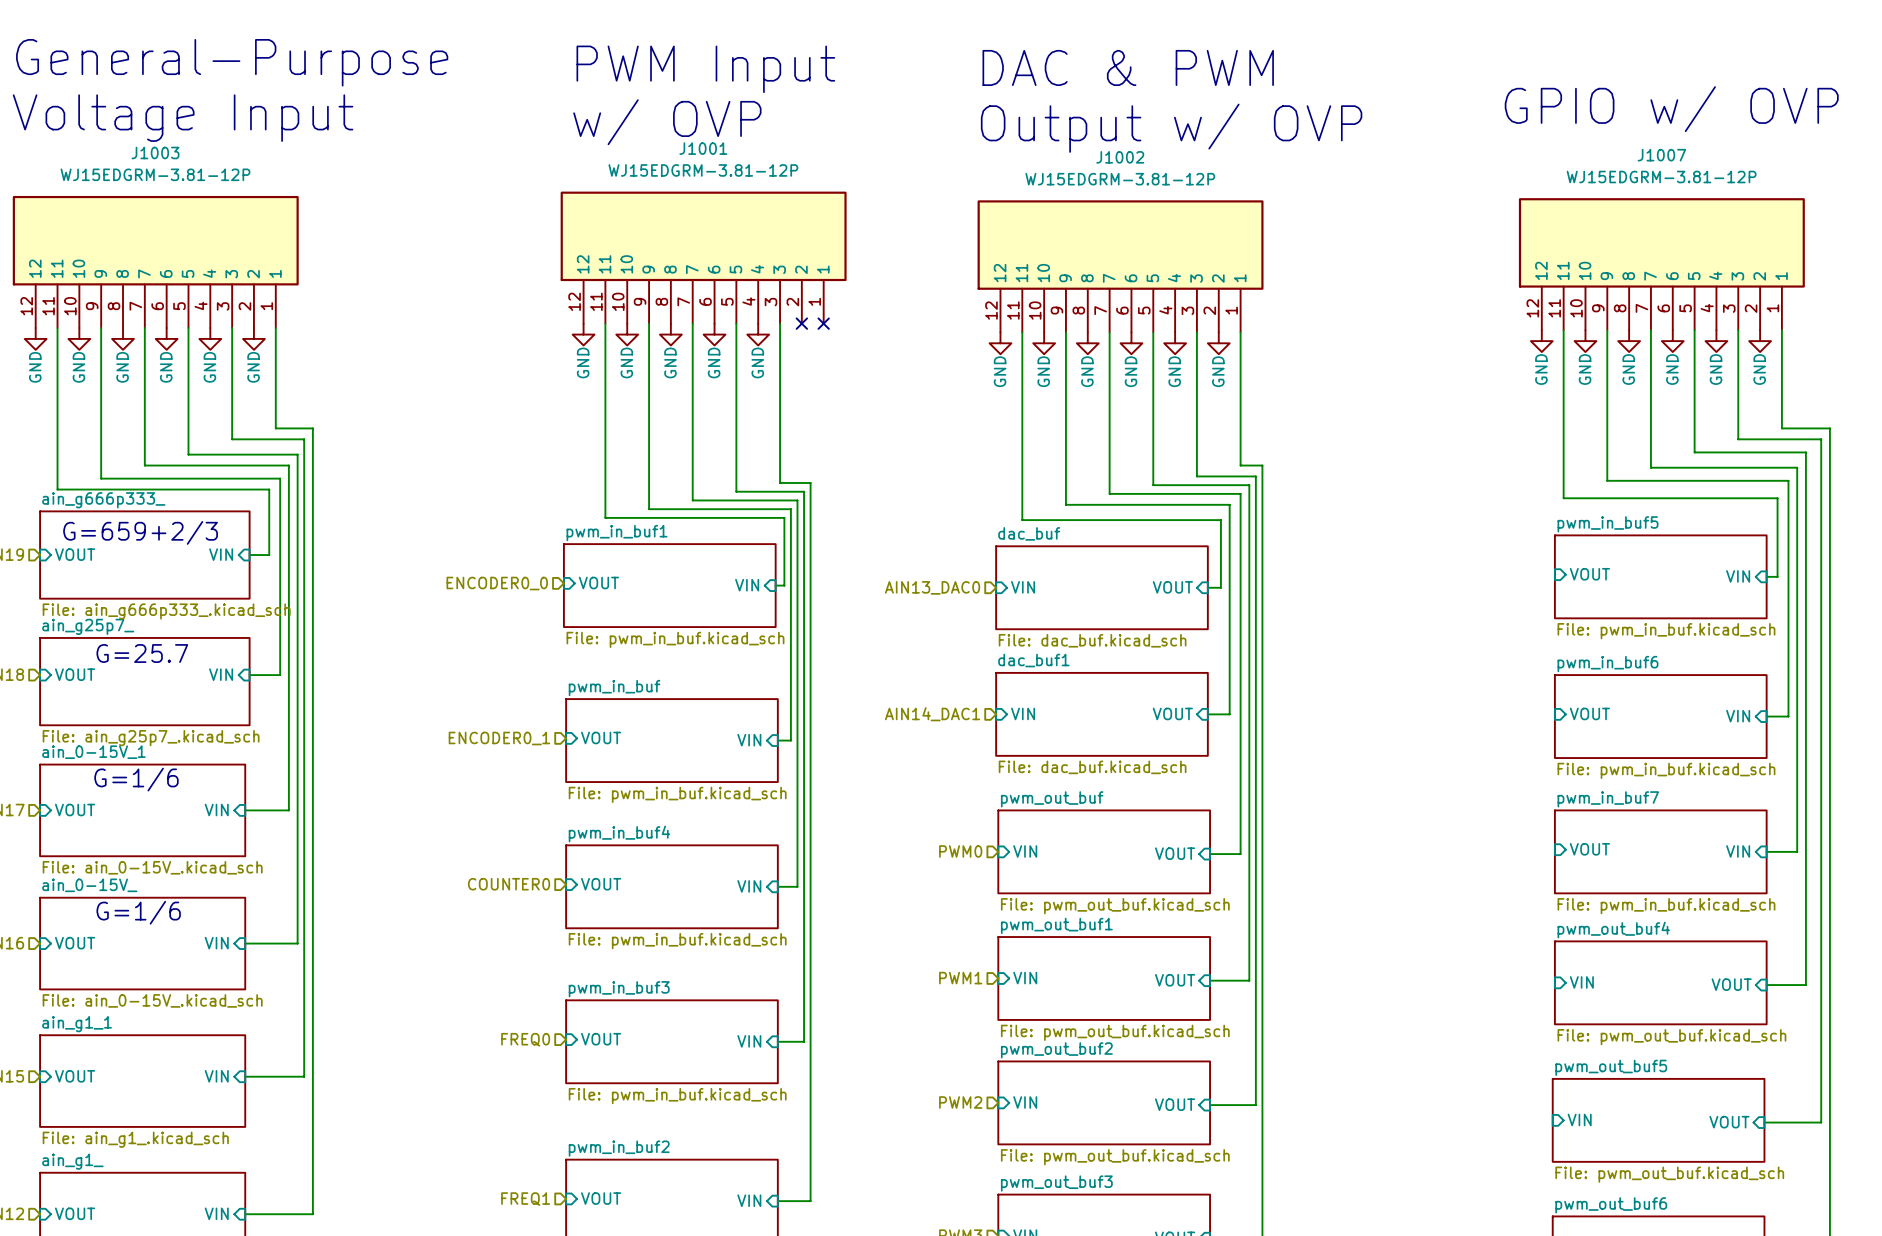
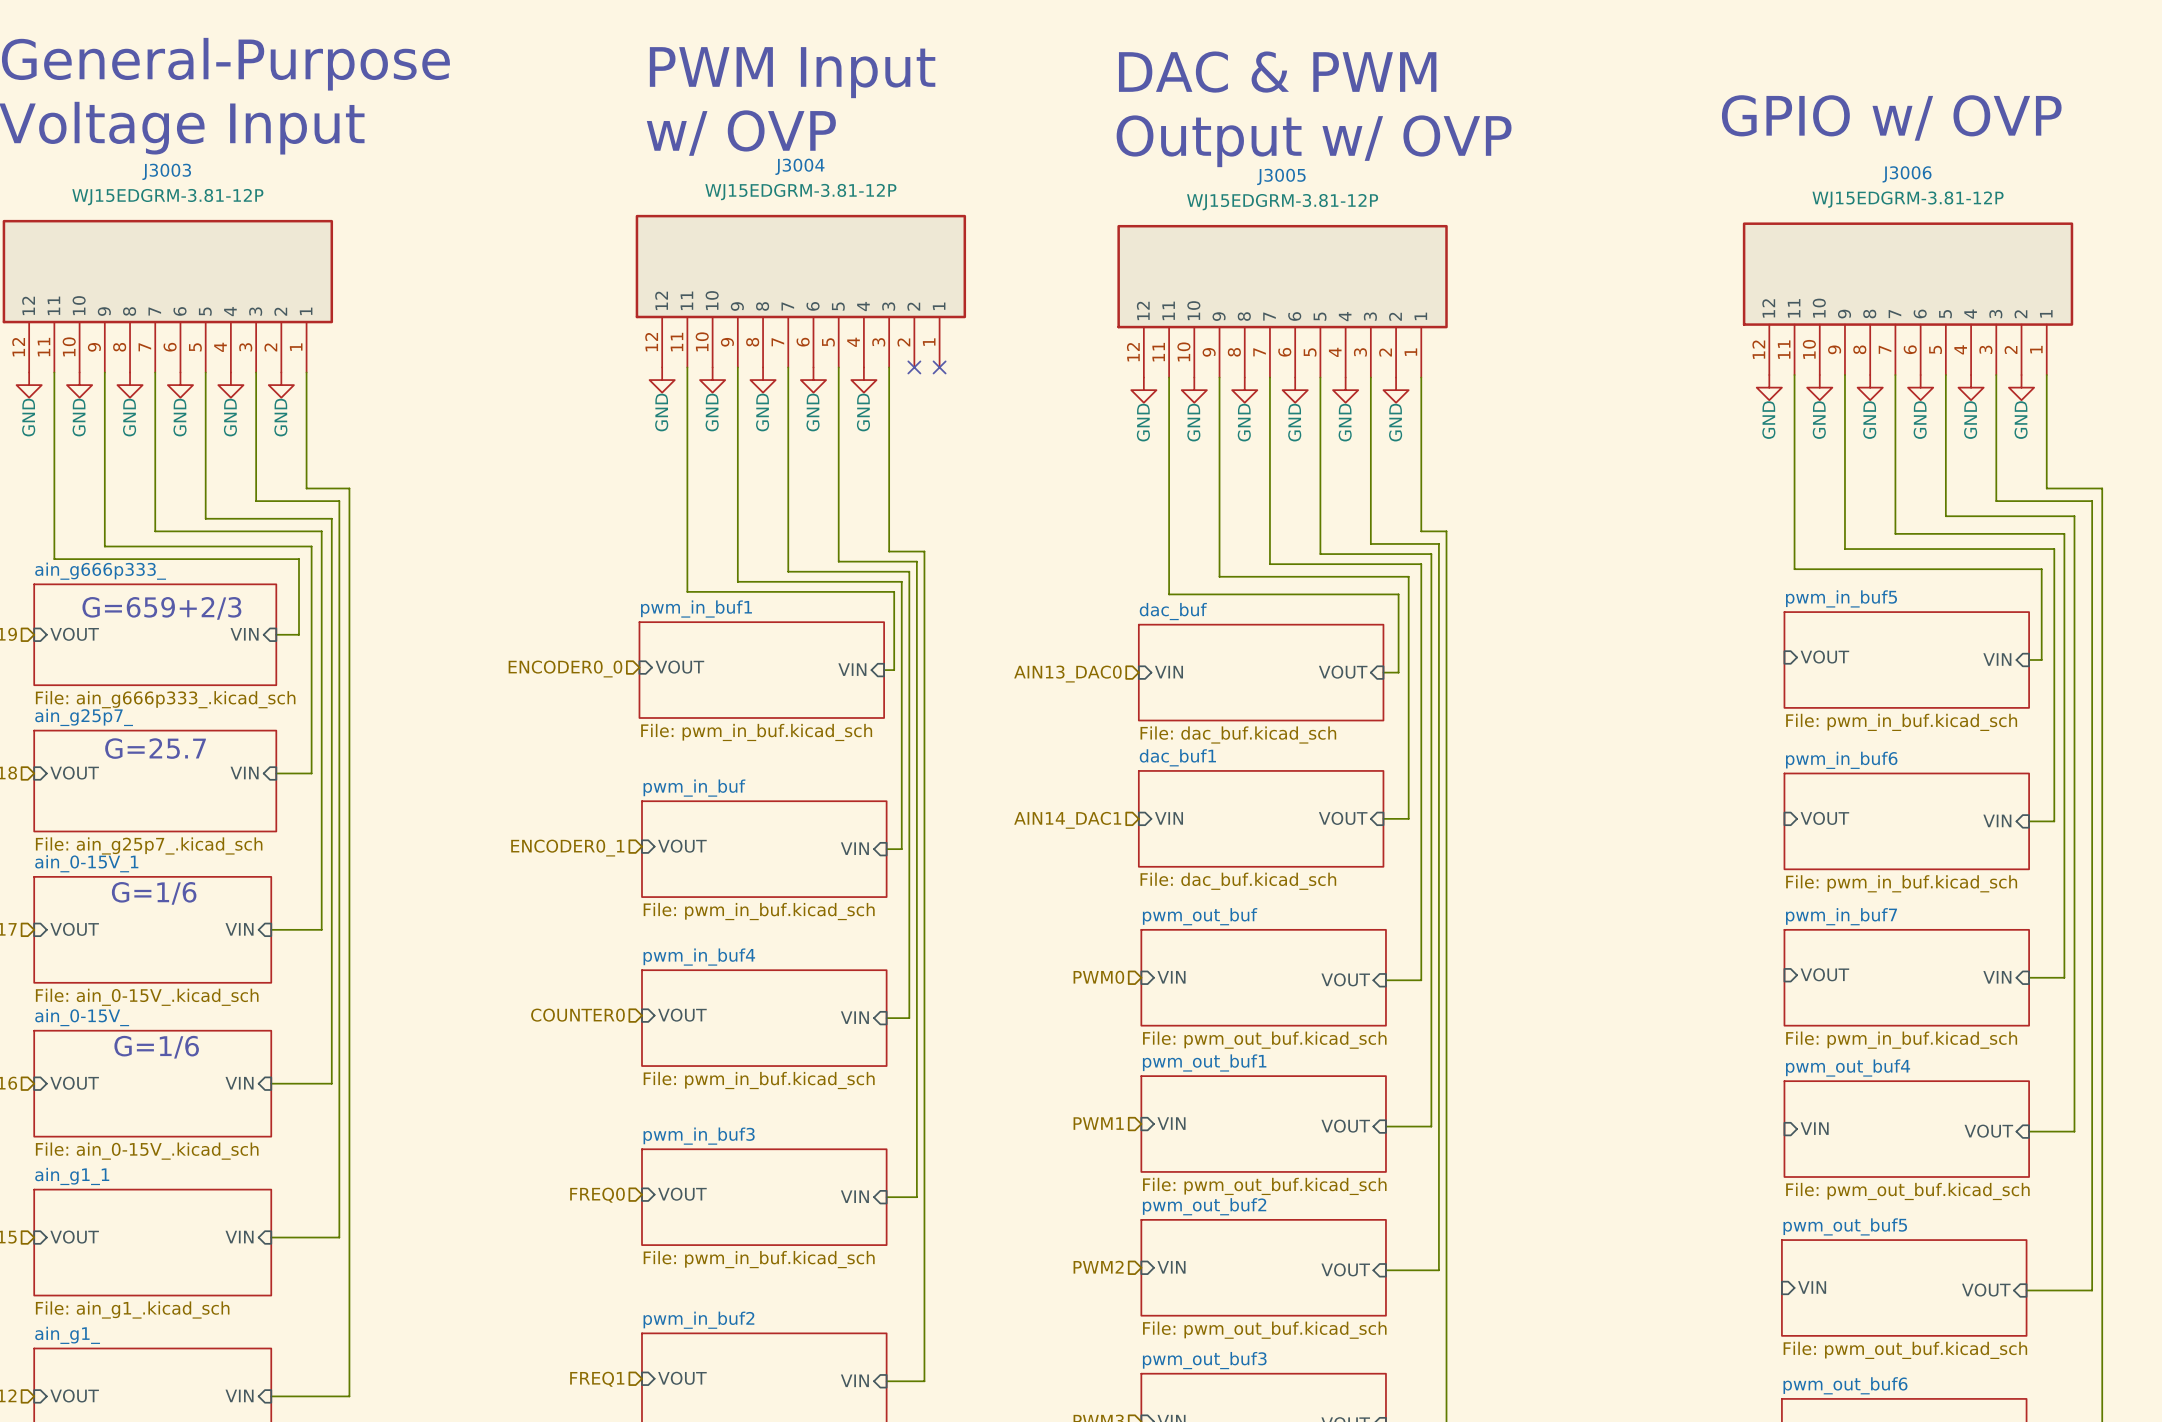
J1001 name: J1001 (703, 148) -> J3004 (799, 166)
J1003 name: J1003 (155, 152) -> J3003 (166, 171)
J1007 name: J1007 (1661, 155) -> J3006 (1907, 174)
J1002 name: J1002 (1120, 157) -> J3005 (1281, 176)

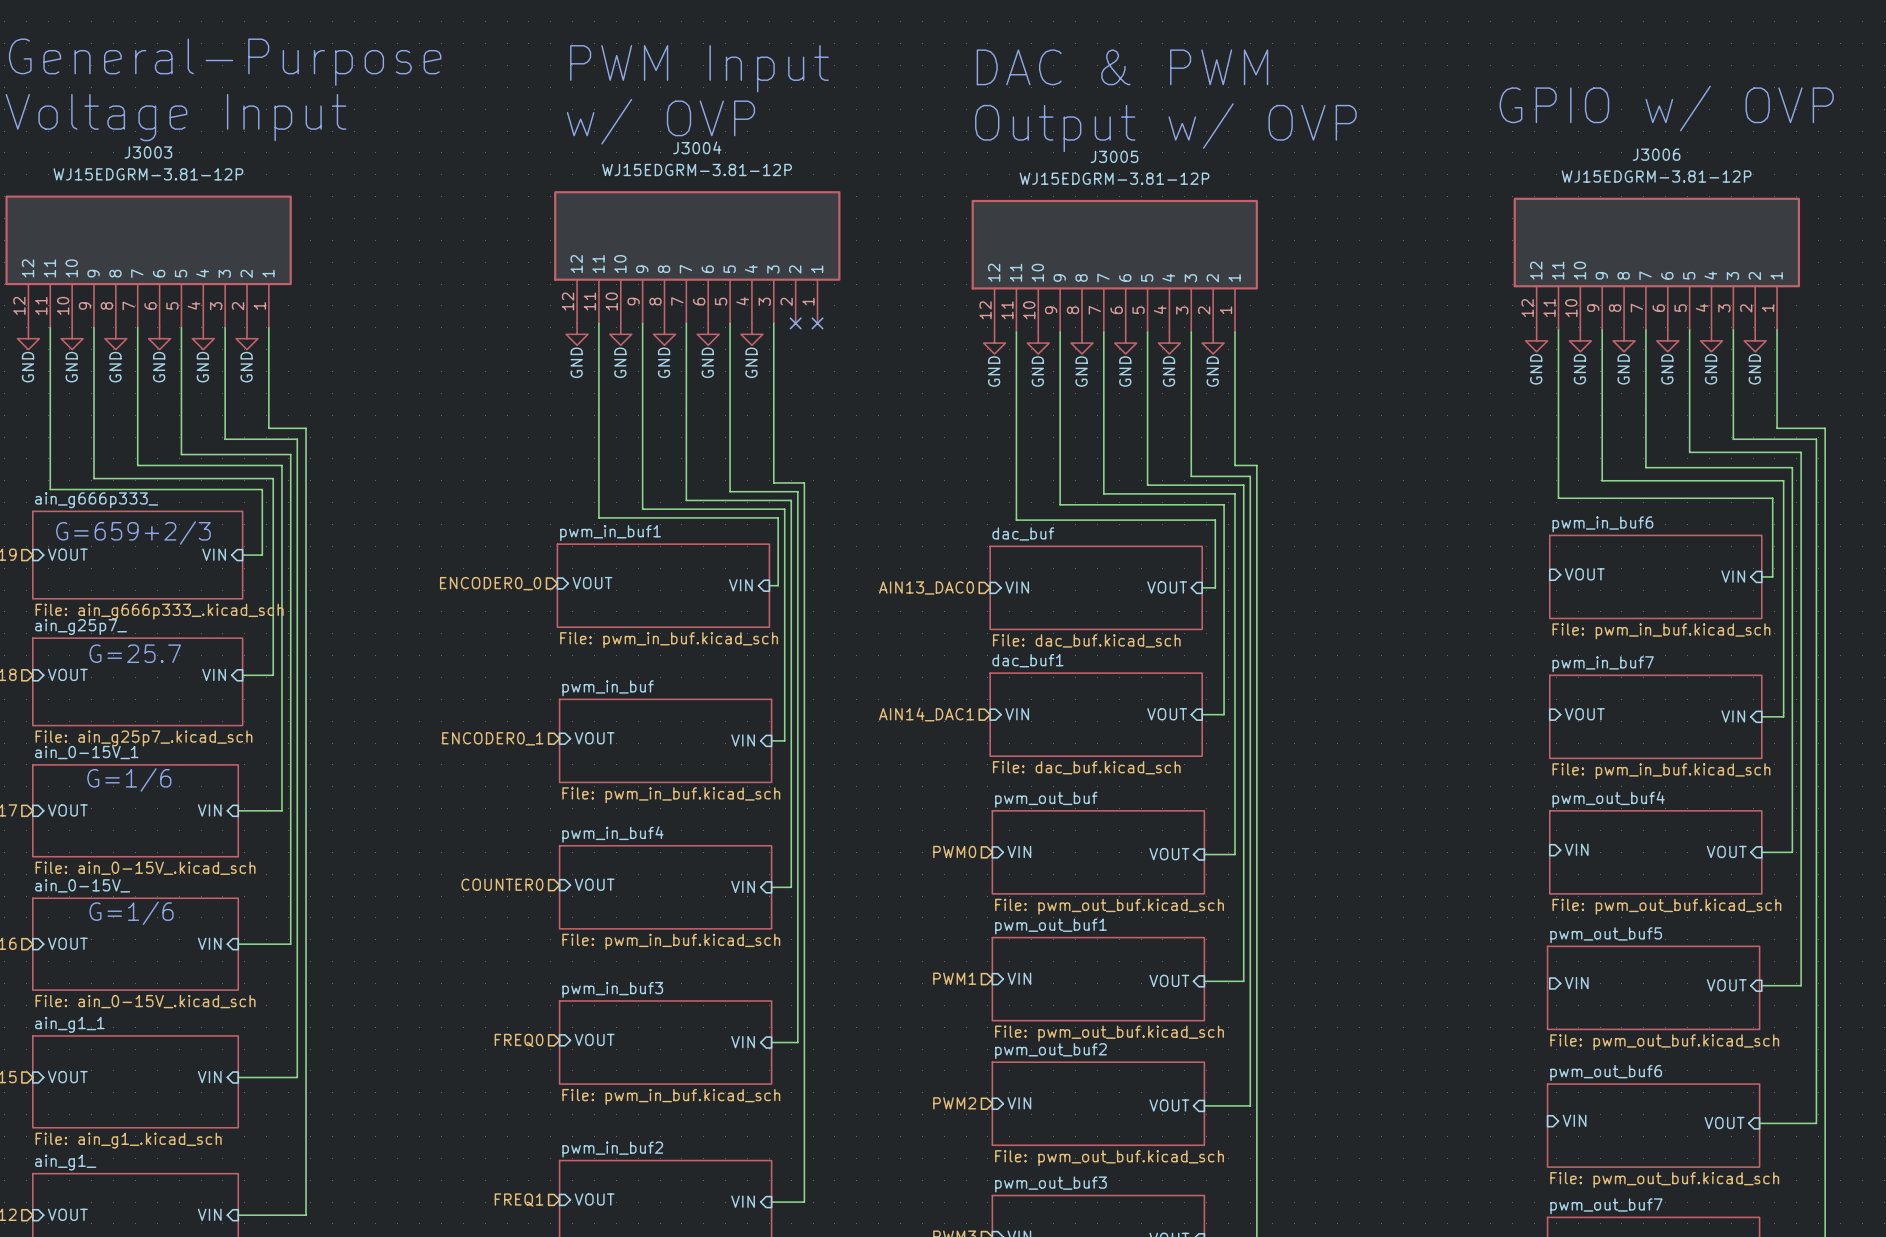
sheet pwm_in_buf5 name: pwm_in_buf5 (1841, 598) -> pwm_in_buf6 (1602, 524)
sheet pwm_in_buf6 name: pwm_in_buf6 (1841, 760) -> pwm_in_buf7 (1603, 664)
sheet pwm_in_buf7 name: pwm_in_buf7 (1841, 916) -> pwm_out_buf4 (1608, 799)
sheet pin: VOUT (1824, 974) -> VIN (1576, 849)
sheet pin: VIN (1997, 977) -> VOUT (1726, 851)
sheet pwm_in_buf7 value: File: pwm_in_buf.kicad_sch (1901, 1040) -> File: pwm_out_buf.kicad_sch (1666, 906)
sheet pwm_out_buf4: File: pwm_out_buf.kicad_sch (1906, 1129) -> none
sheet pwm_out_buf5 position: (1904, 1287) -> (1653, 987)
sheet pwm_out_buf6: none -> File: pwm_out_buf.kicad_sch (1653, 1125)
sheet pwm_out_buf6 name: pwm_out_buf6 (1845, 1385) -> pwm_out_buf7 (1606, 1206)

